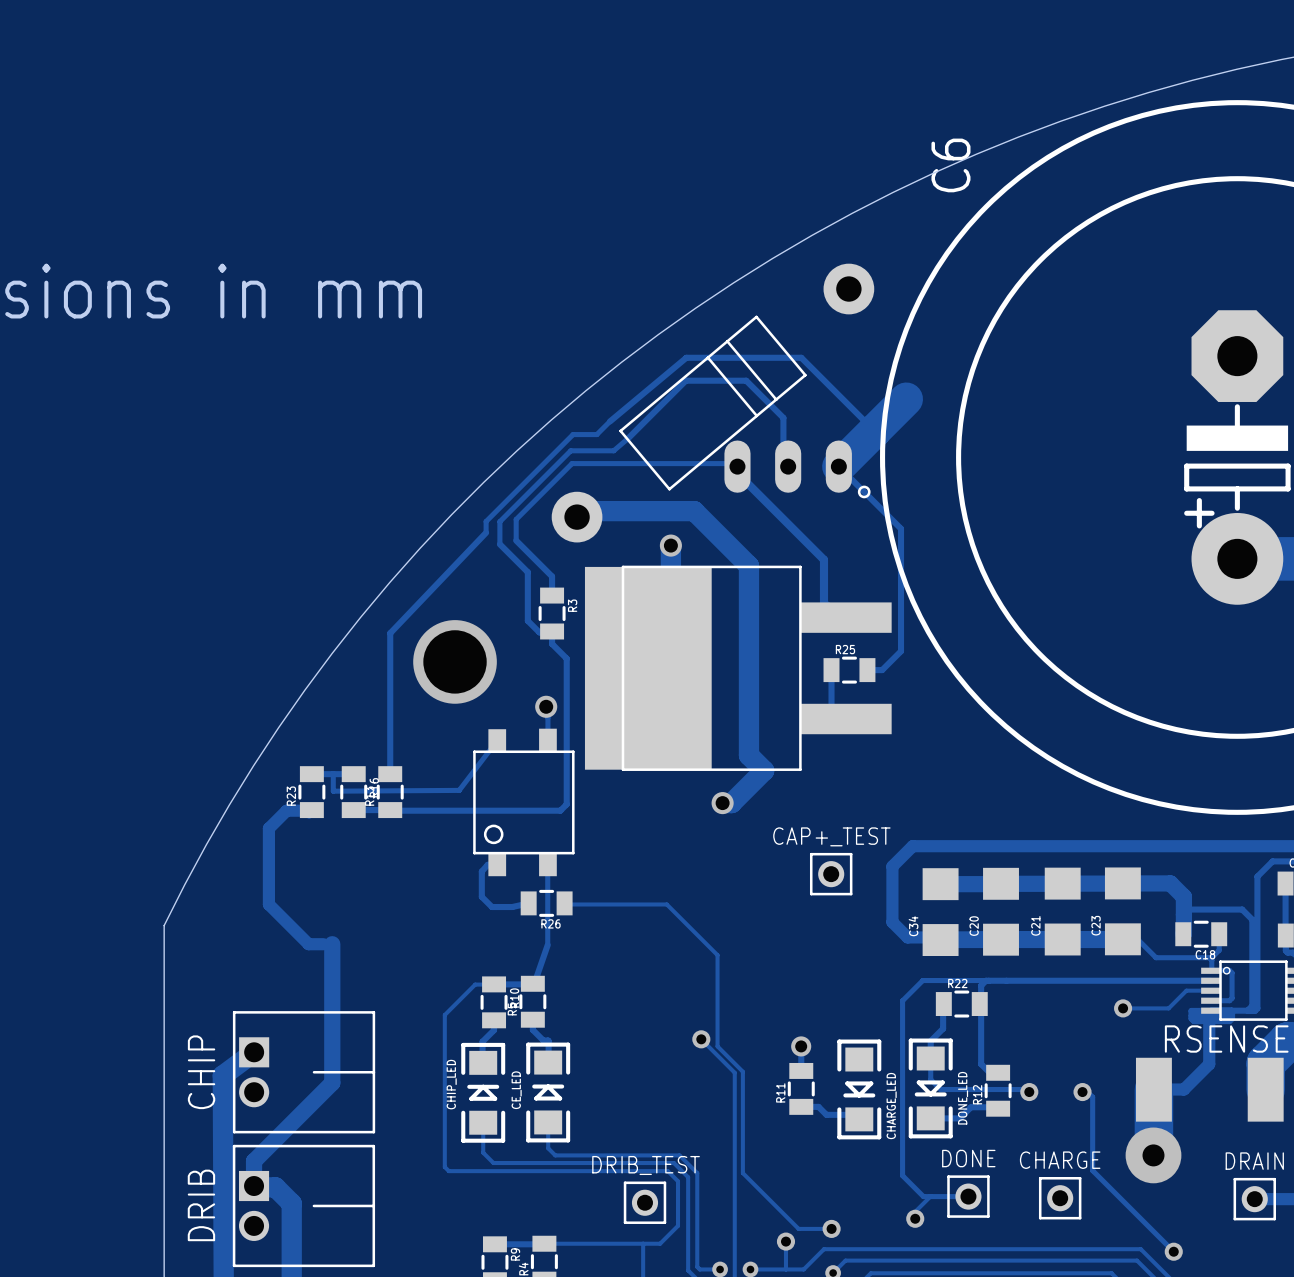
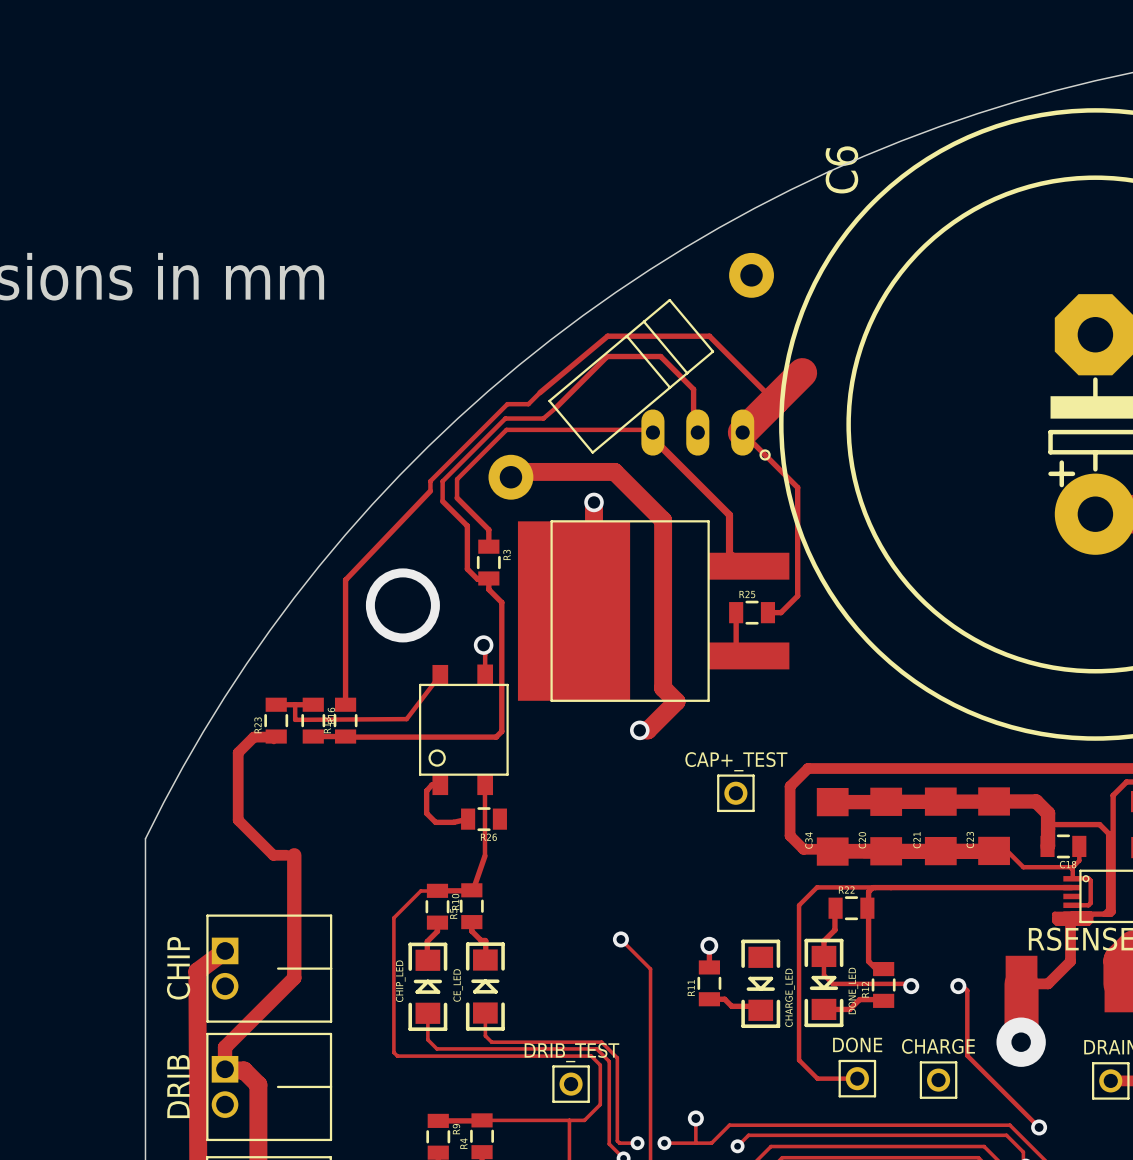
track: (564, 903) (666, 904) (717, 955) (717, 1046) (742, 1071) (742, 1173) (798, 1228) (831, 1228) -> none
track: (1210, 990) (1186, 990) (1168, 1008) (1123, 1008) -> none
via: (1123, 1008) -> none
track: (930, 1196) (915, 1211) (915, 1218) -> none
via: (915, 1218) -> none
via: (831, 1228) -> none

